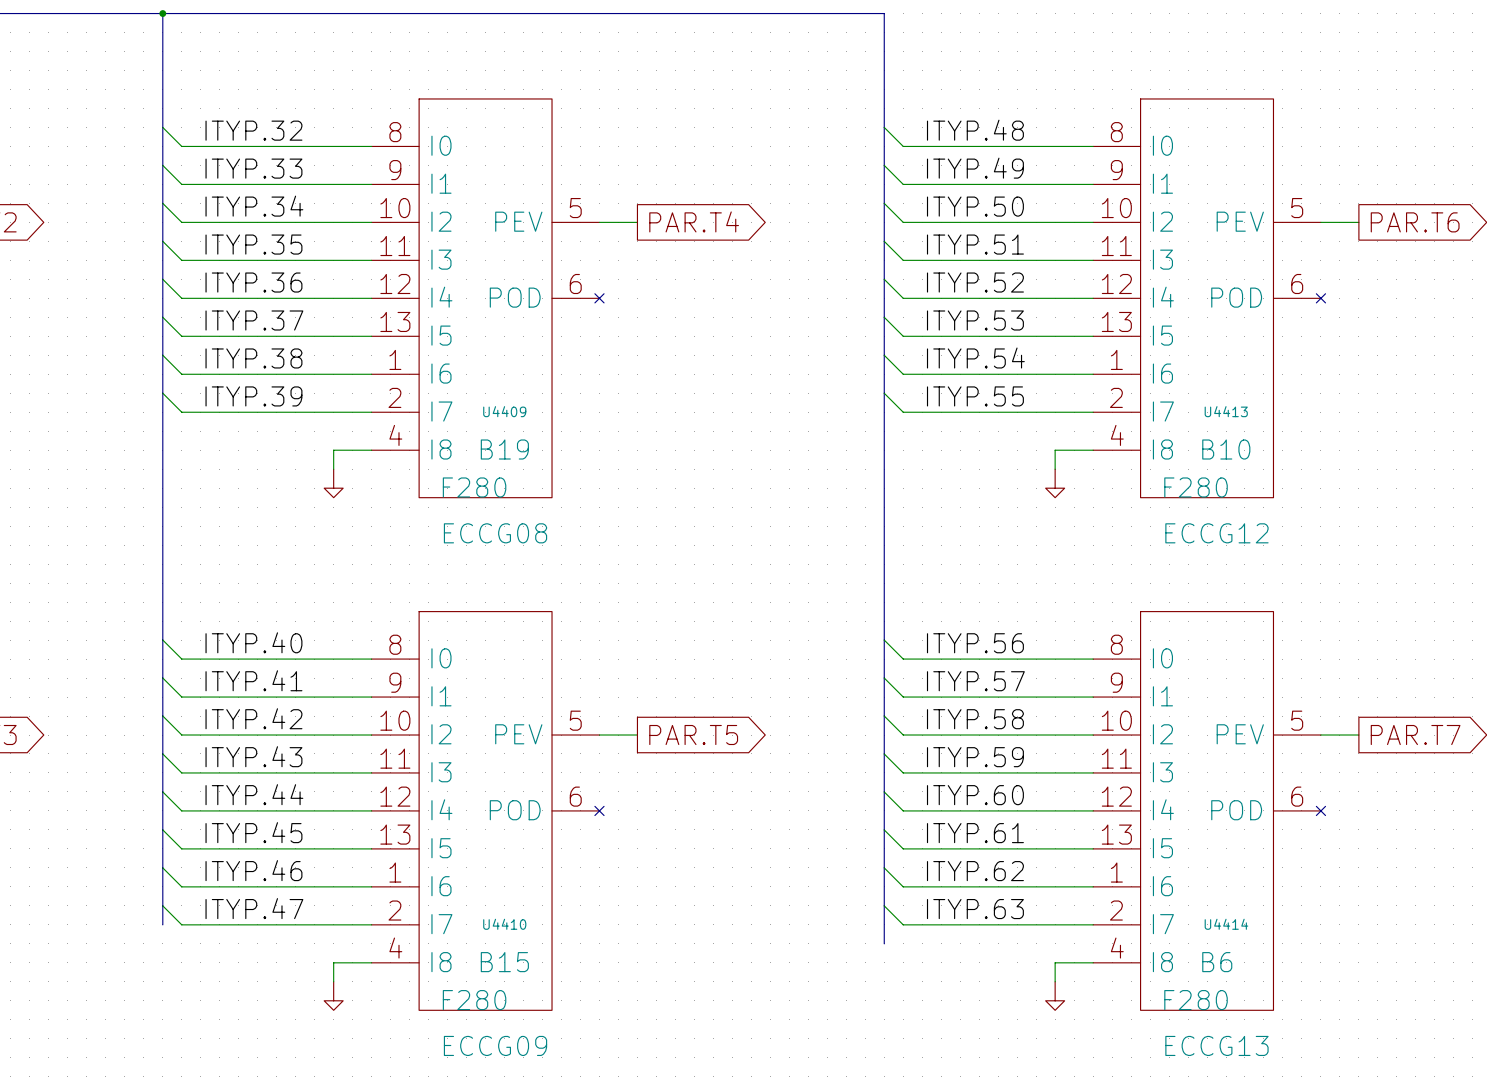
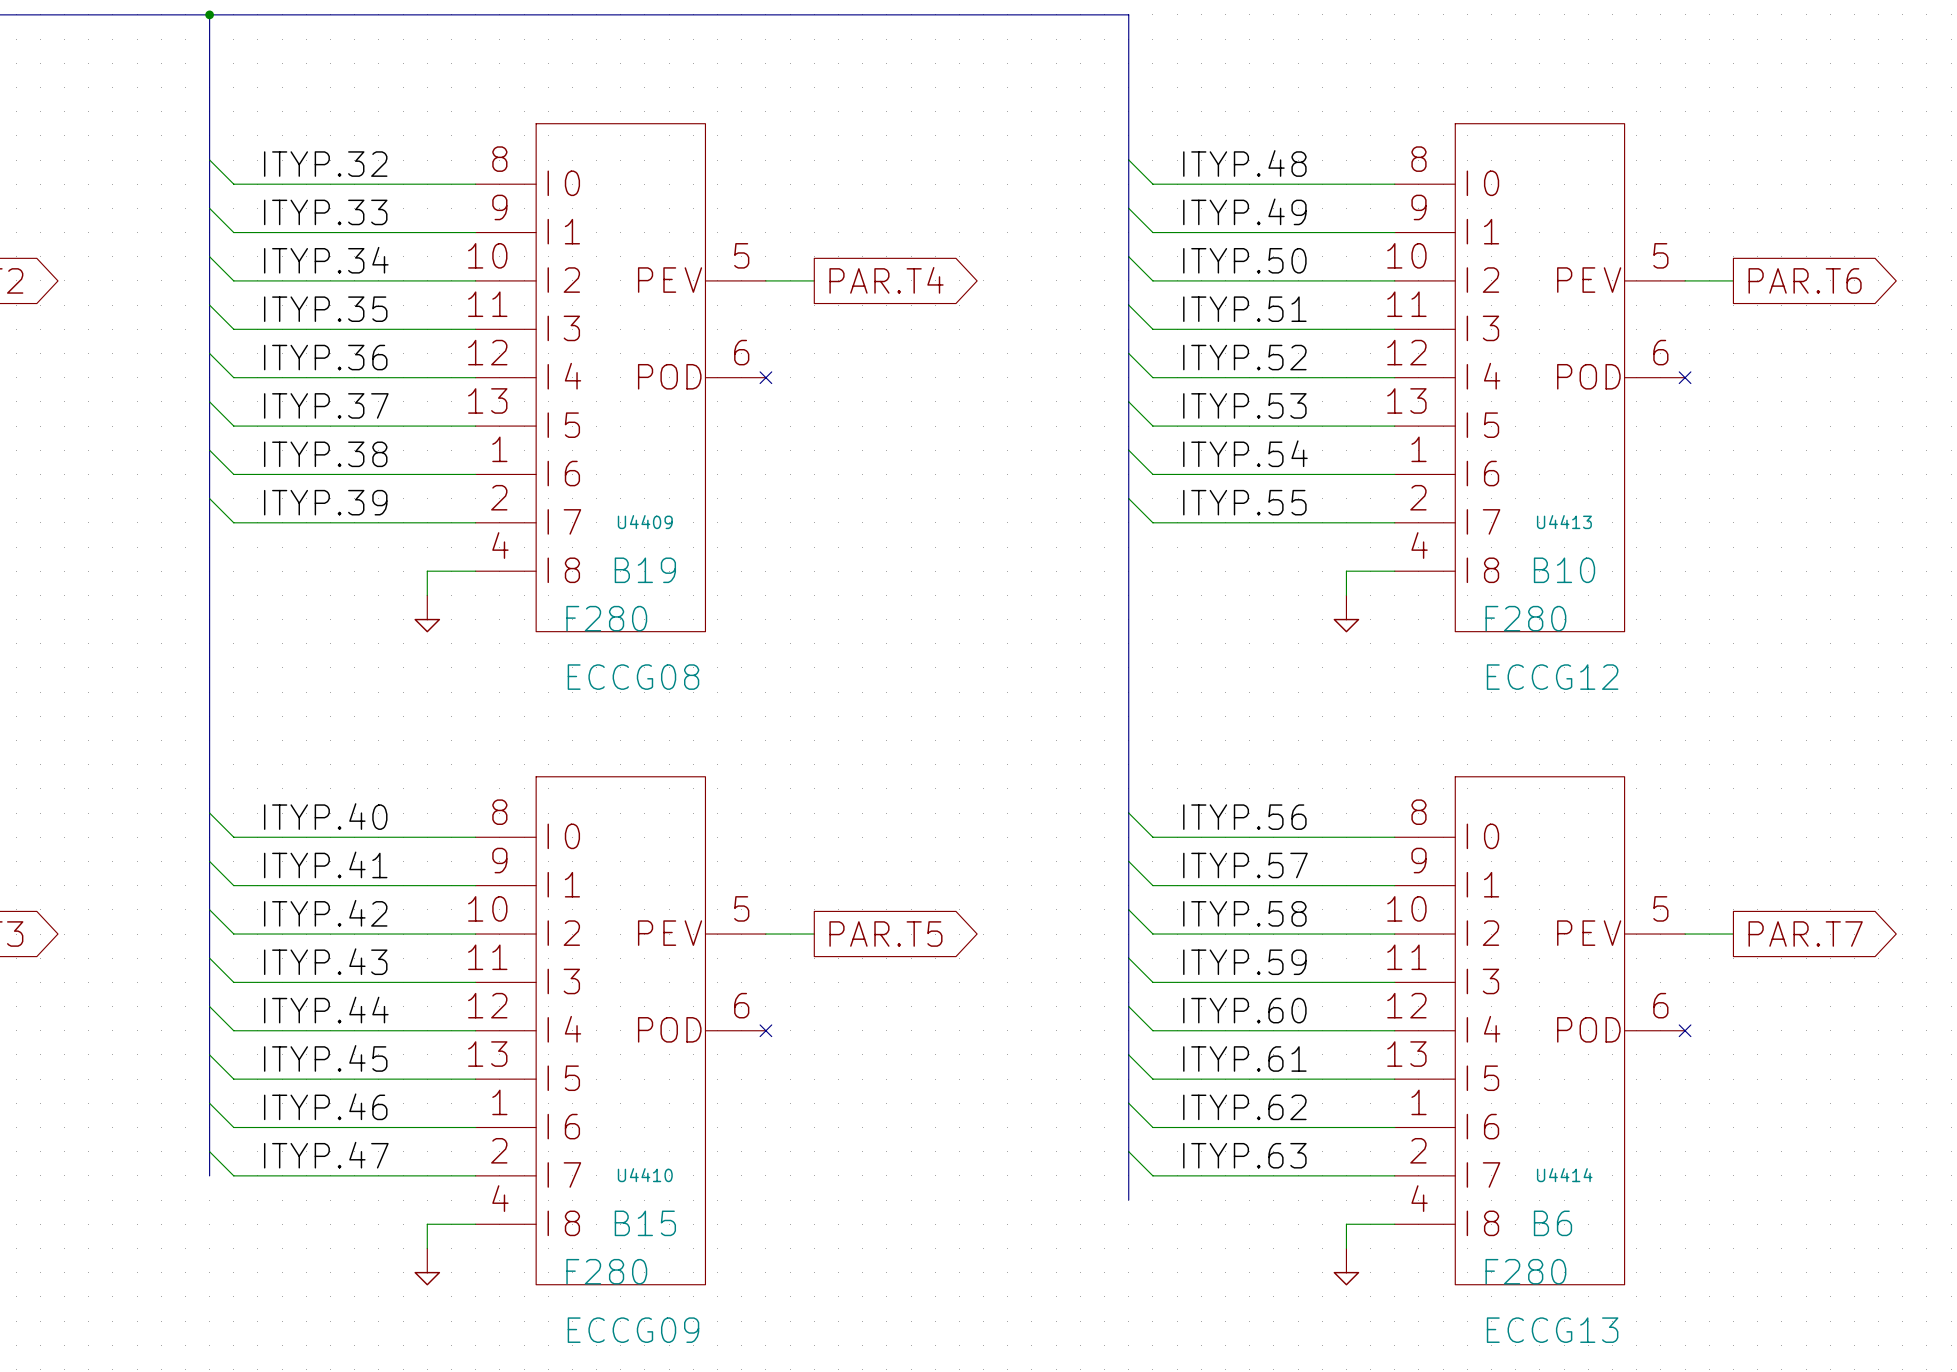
U4409 symbol: [371, 98, 600, 498] -> [475, 123, 766, 632]
U4413 symbol: [1093, 98, 1321, 498] -> [1394, 123, 1686, 632]
U4410 symbol: [371, 611, 600, 1011] -> [475, 776, 766, 1285]
U4414 symbol: [1093, 611, 1321, 1011] -> [1394, 776, 1686, 1285]

